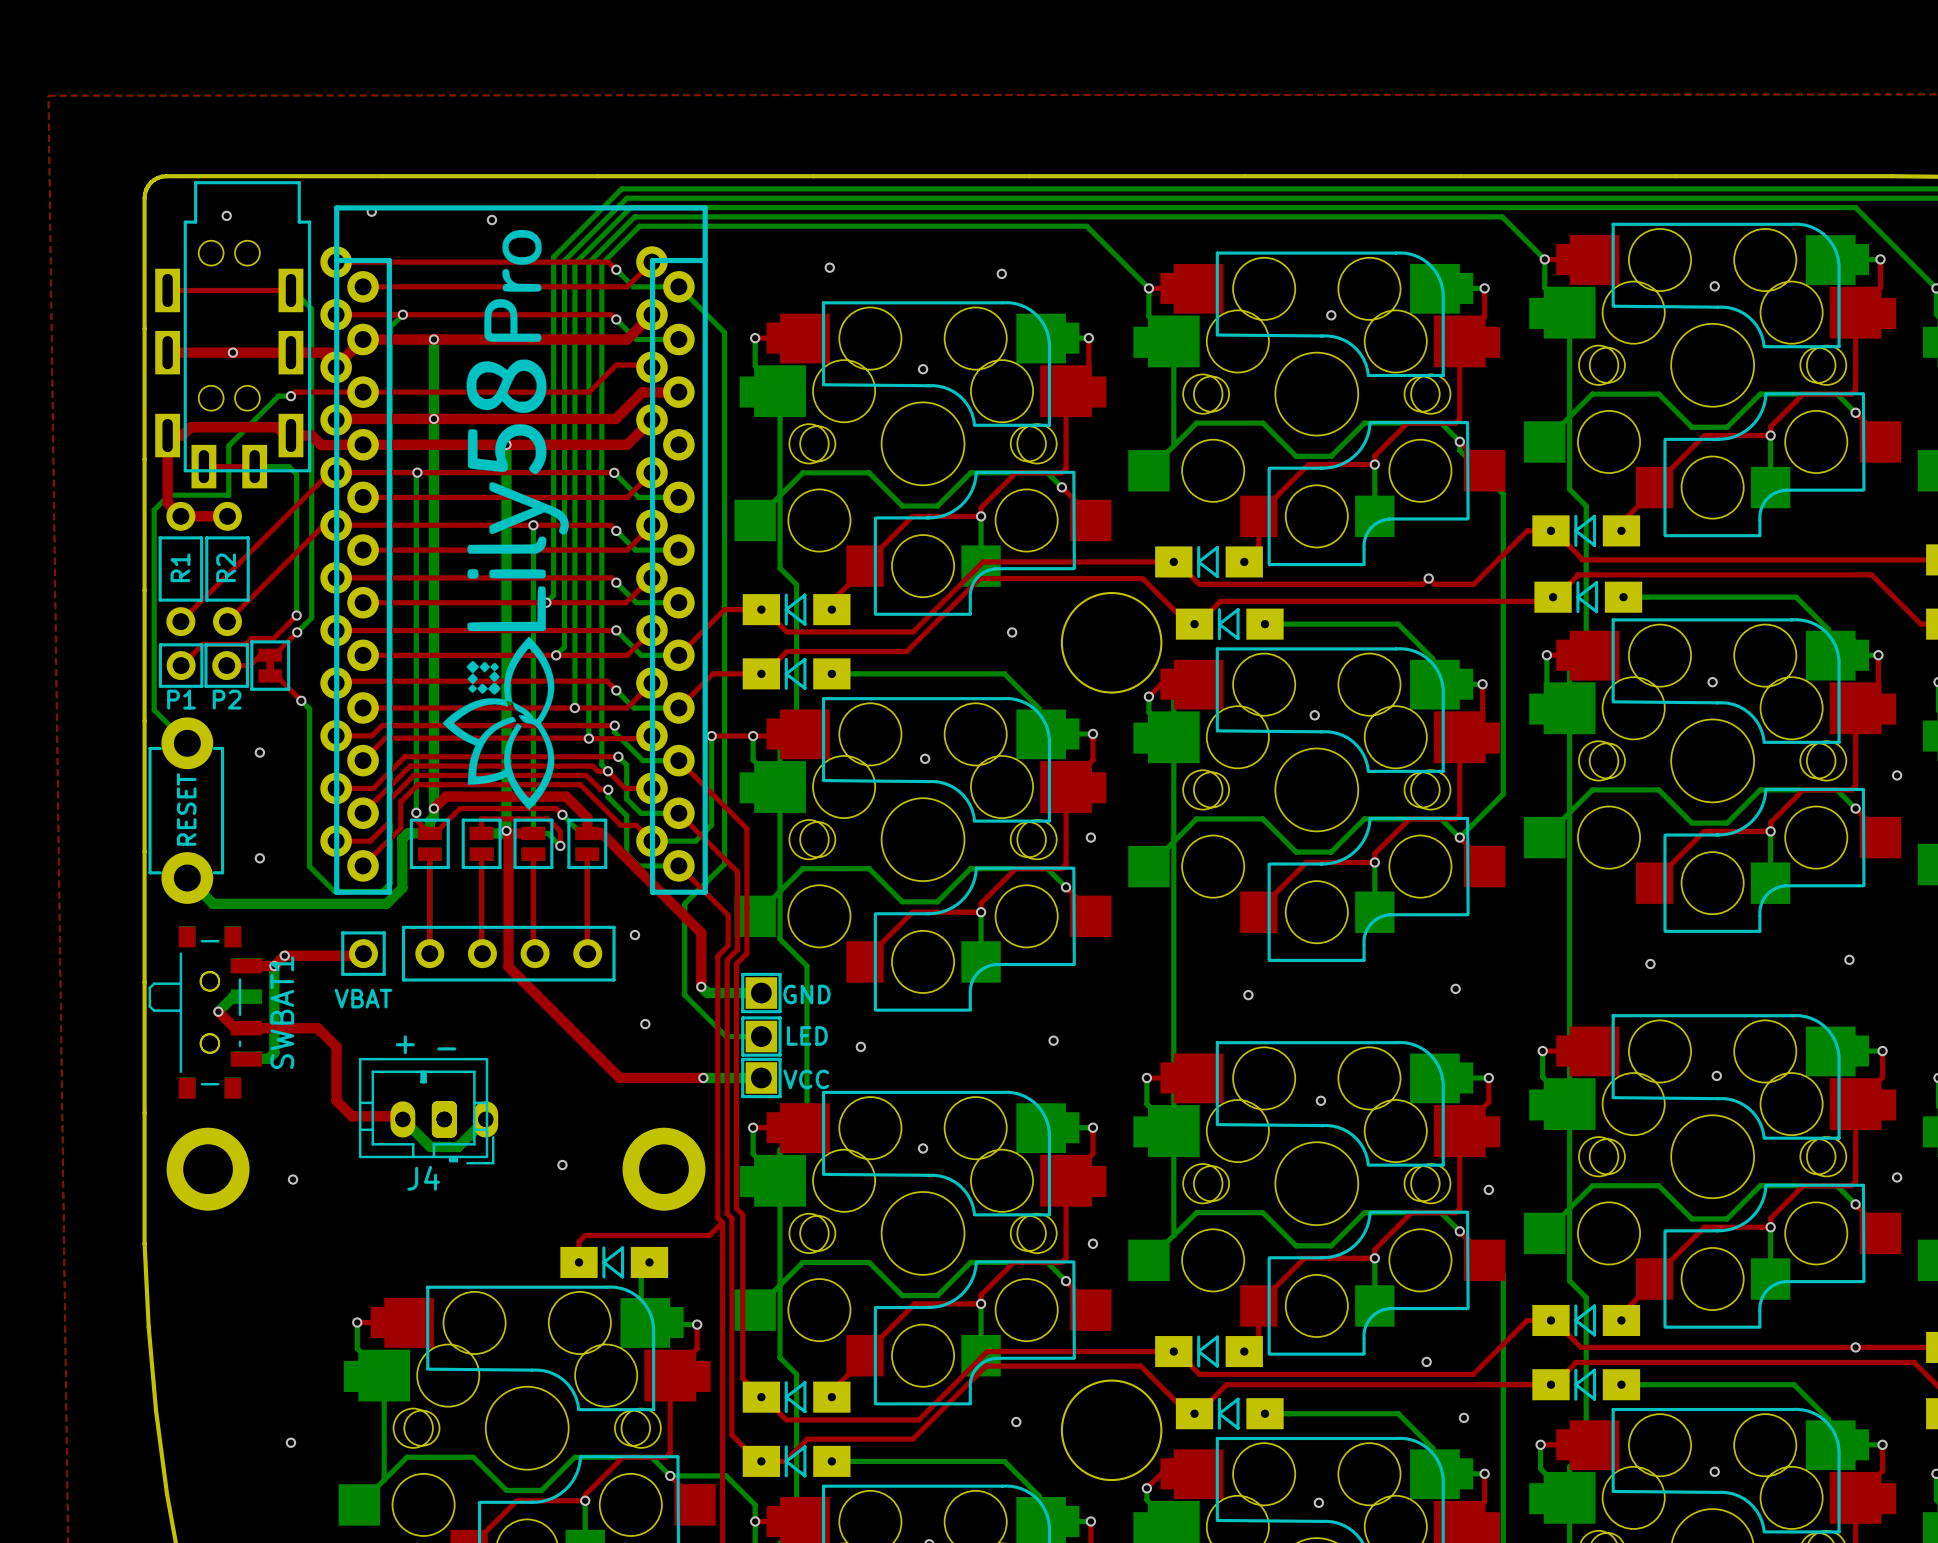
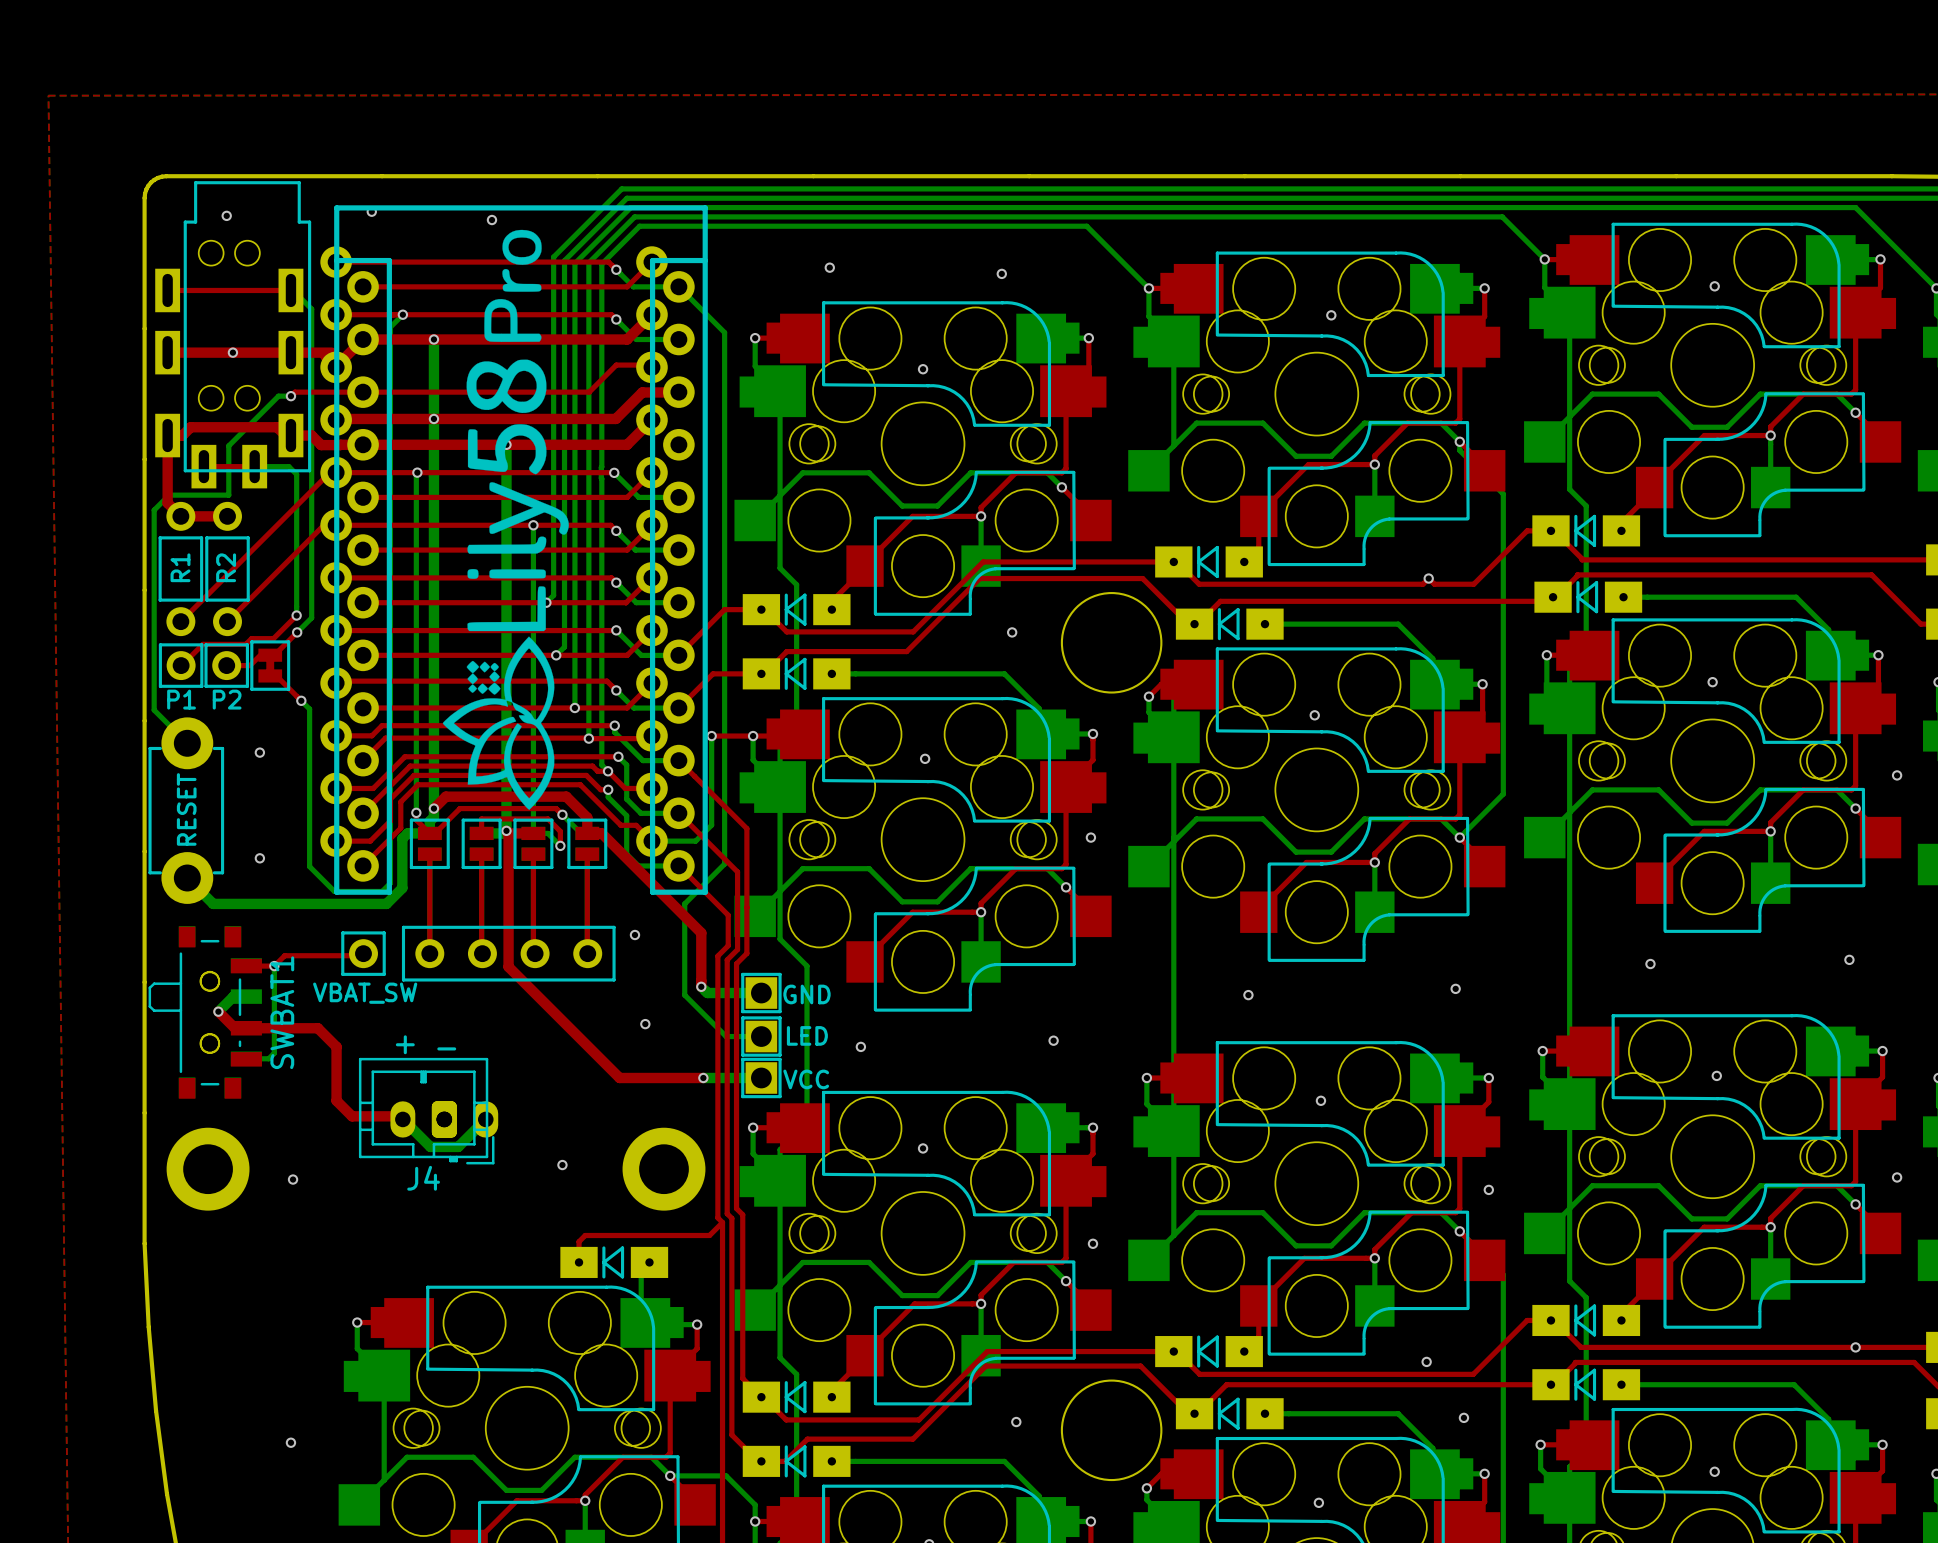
via: (284, 955) -> none
top track width: thick (363, 955) (284, 955) (274, 966) (246, 966) -> thin (363, 955) (284, 955) (274, 966) (246, 966)
bottom track width: thick (274, 966) (274, 1053) (268, 1058) (246, 1058) -> thin (274, 966) (274, 1053) (268, 1058) (246, 1058)
part value: VBAT (363, 998) -> VBAT_SW (365, 993)

